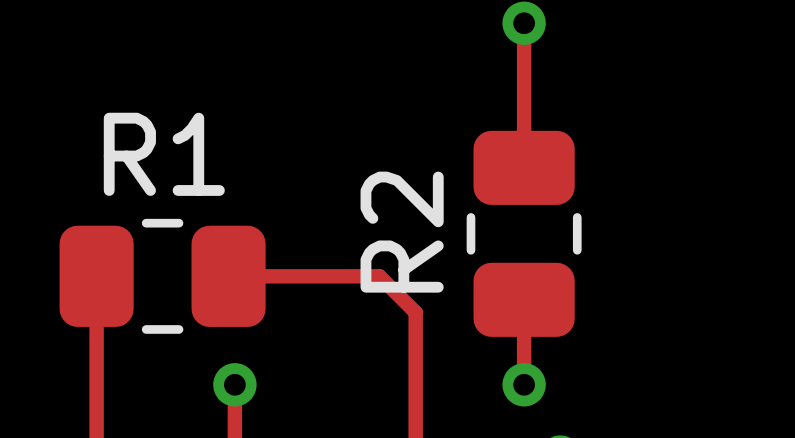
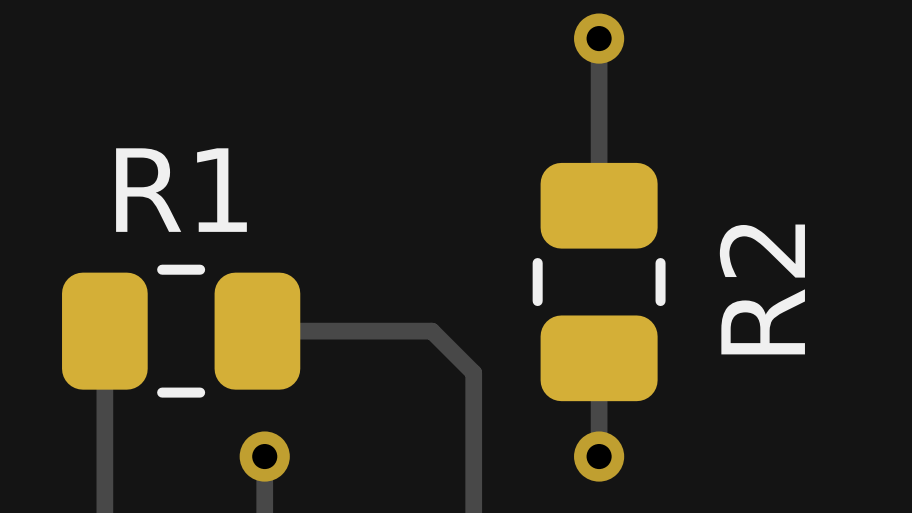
R2 name position: R2 (402, 232) -> R2 (762, 289)

